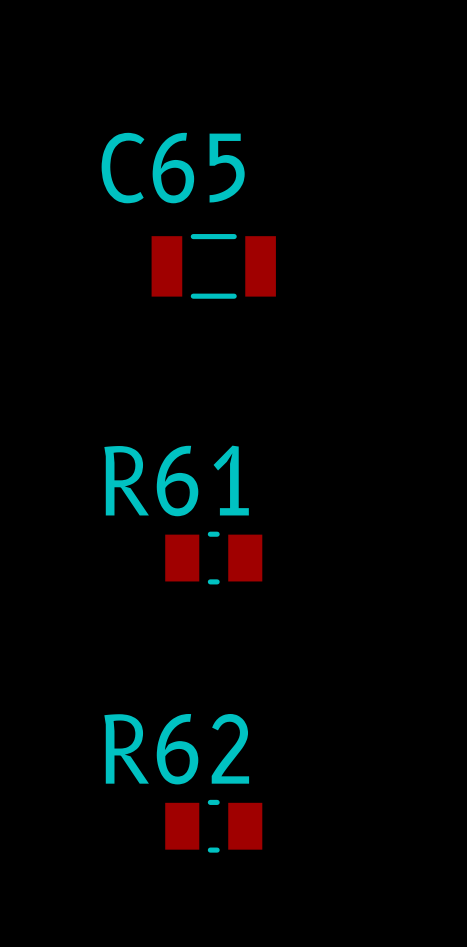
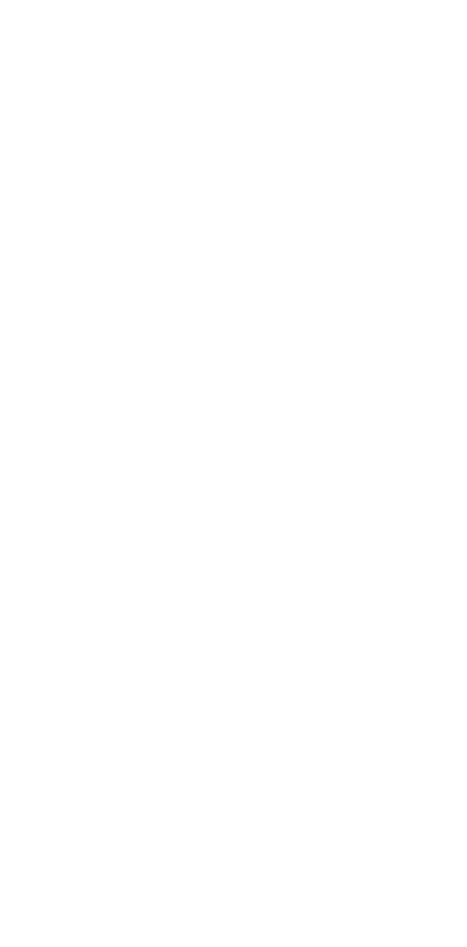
C65: (213, 266) -> none
R61: (213, 558) -> none
R62: (213, 826) -> none

